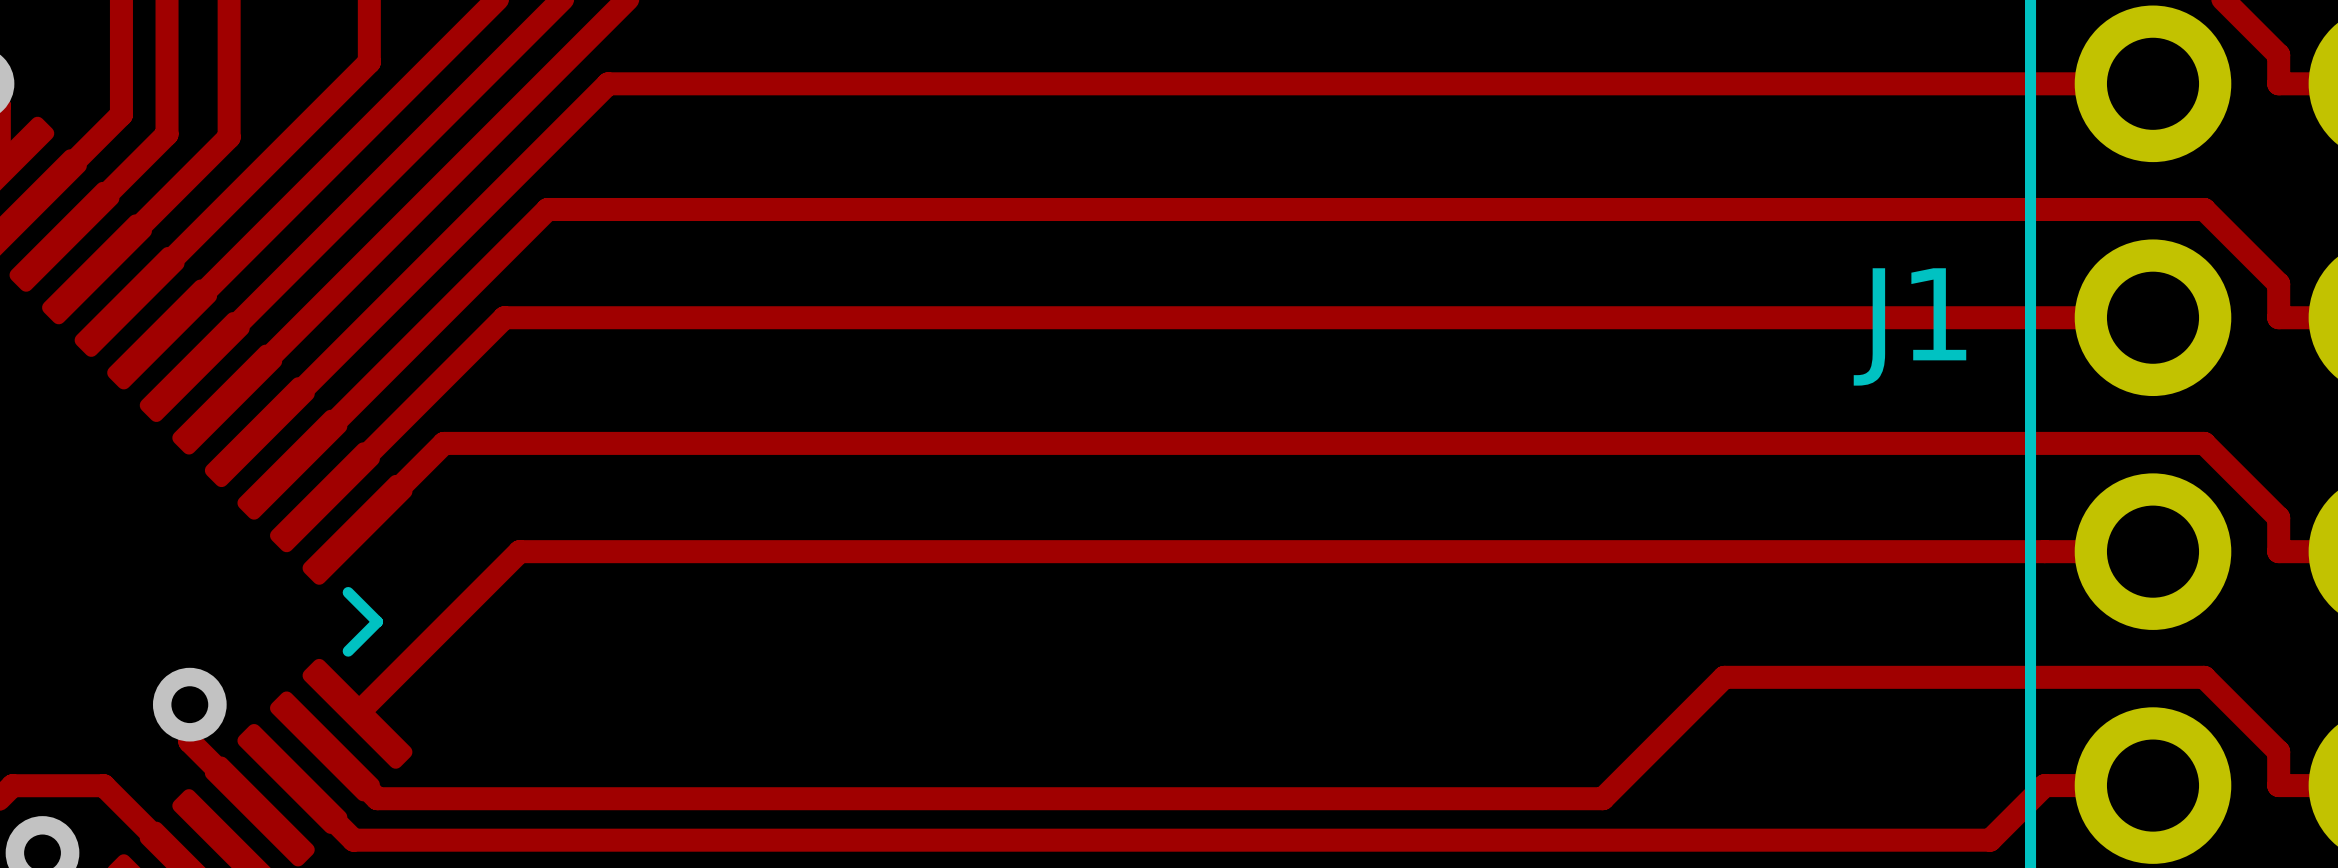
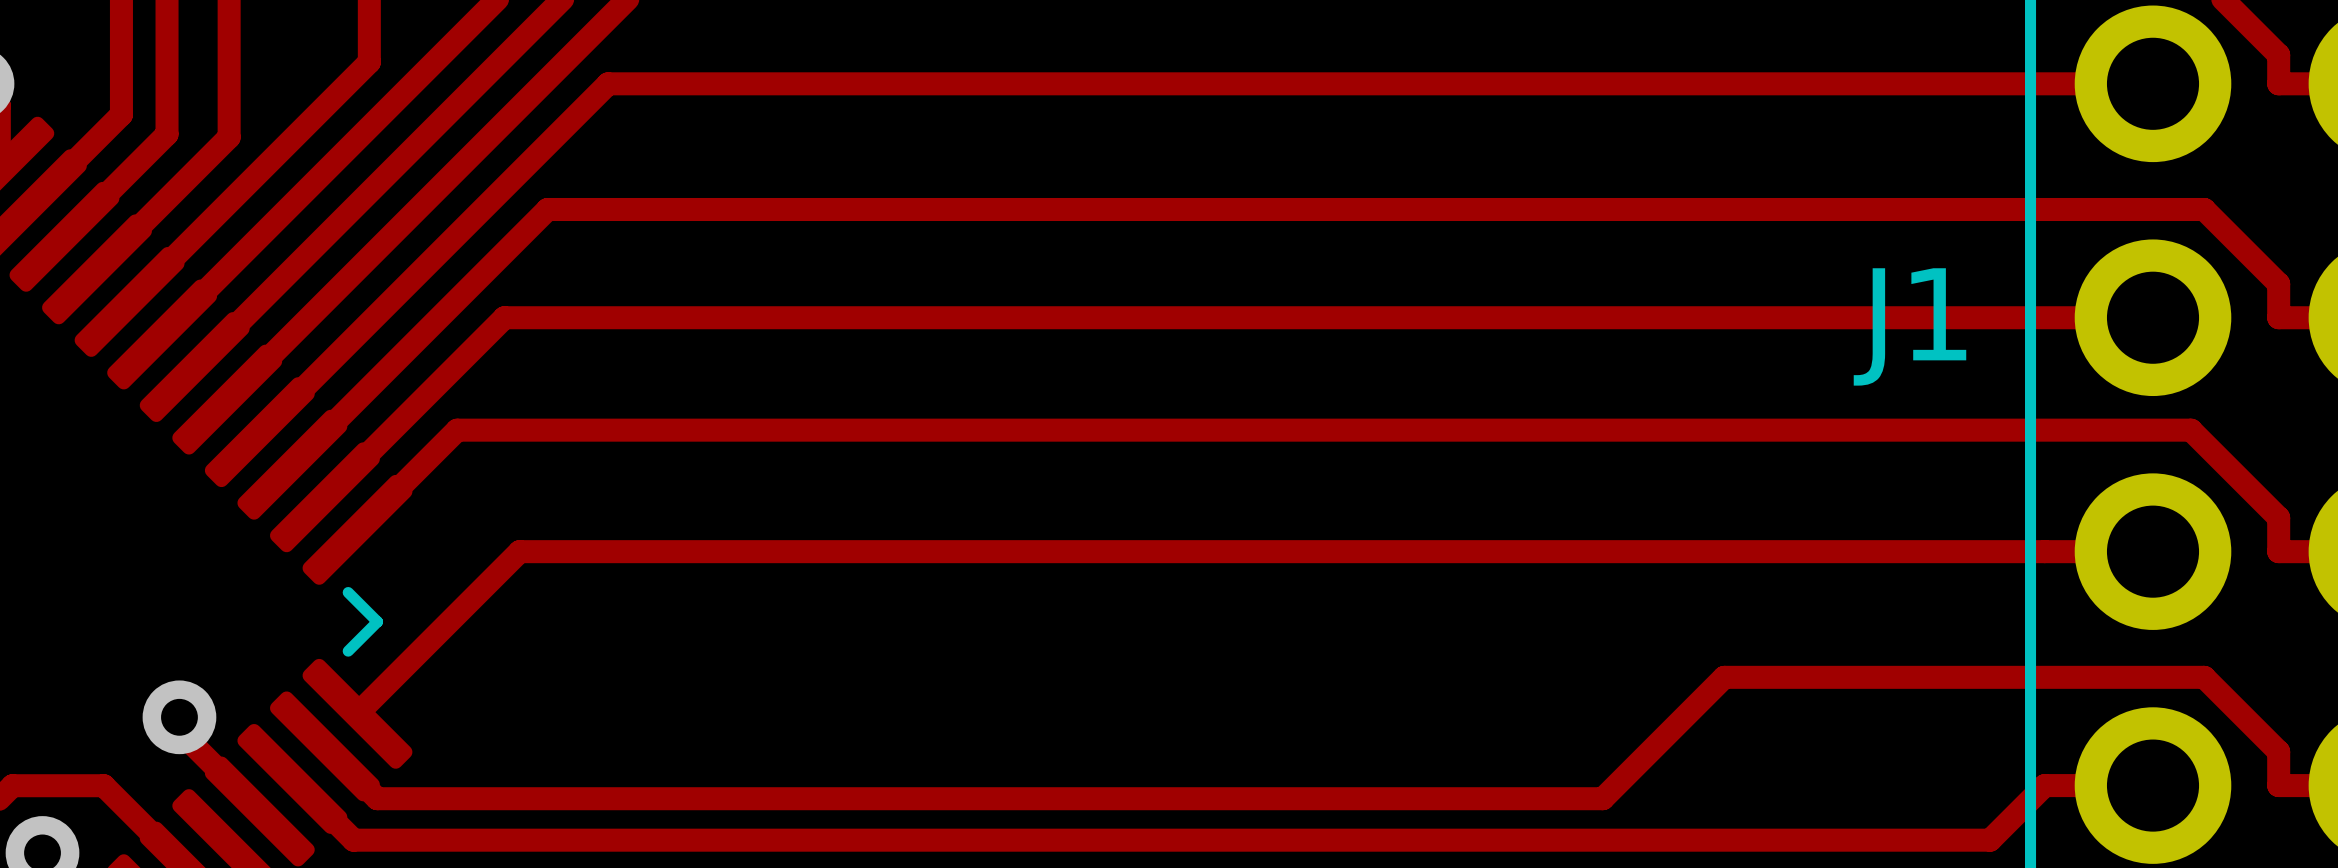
track: (443, 443) (2204, 443) -> (443, 443) (457, 430) (2191, 430) (2204, 443)
via position: (189, 704) -> (179, 717)

